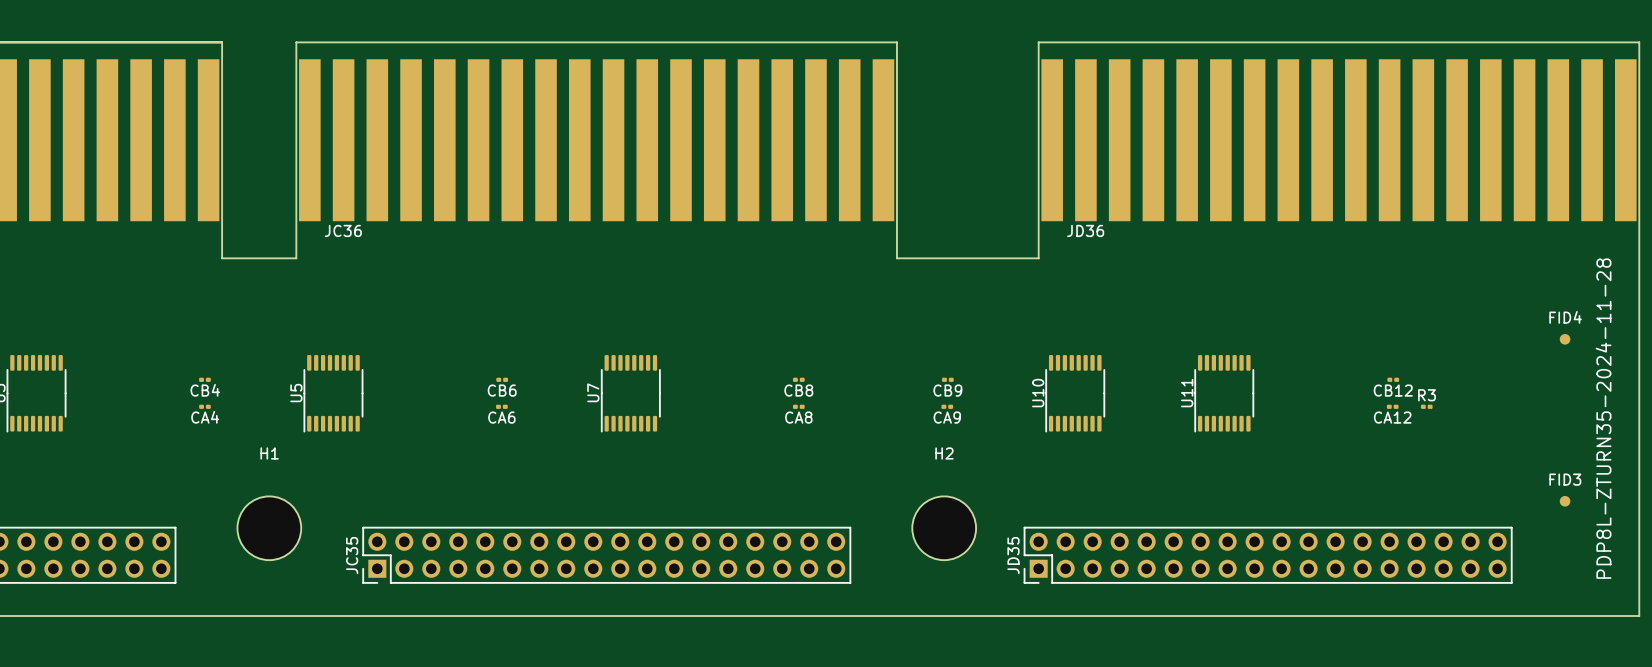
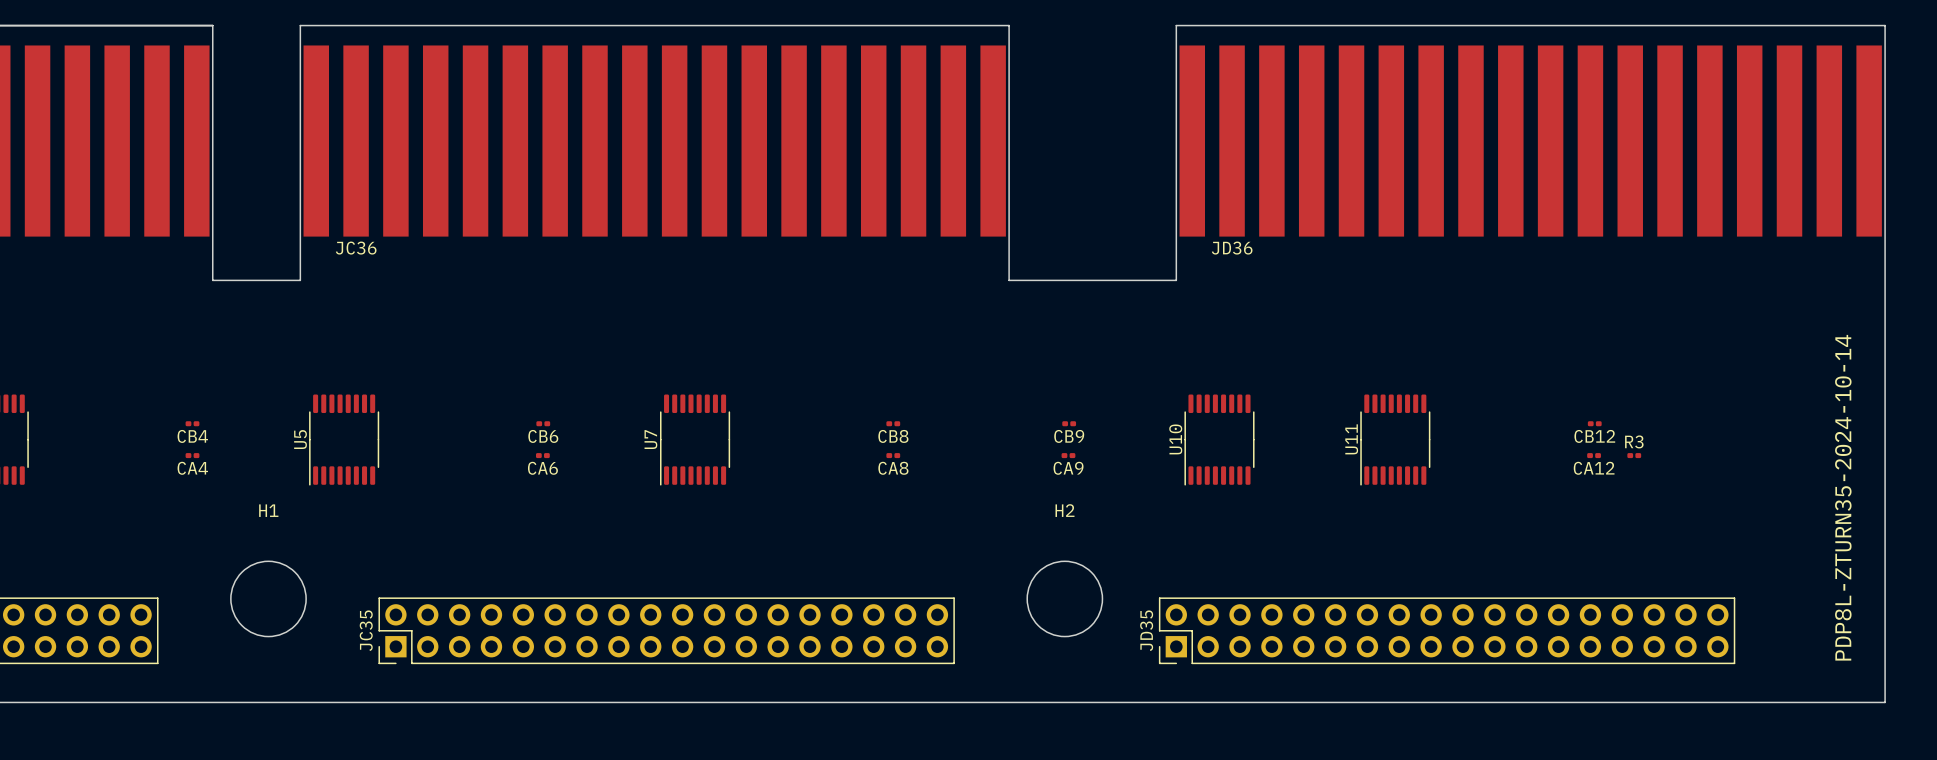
FID4: (1565, 339) -> none
text: PDP8L-ZTURN35-2024-11-28 (1603, 418) -> PDP8L-ZTURN35-2024-10-14 (1843, 497)
FID3: (1565, 501) -> none

